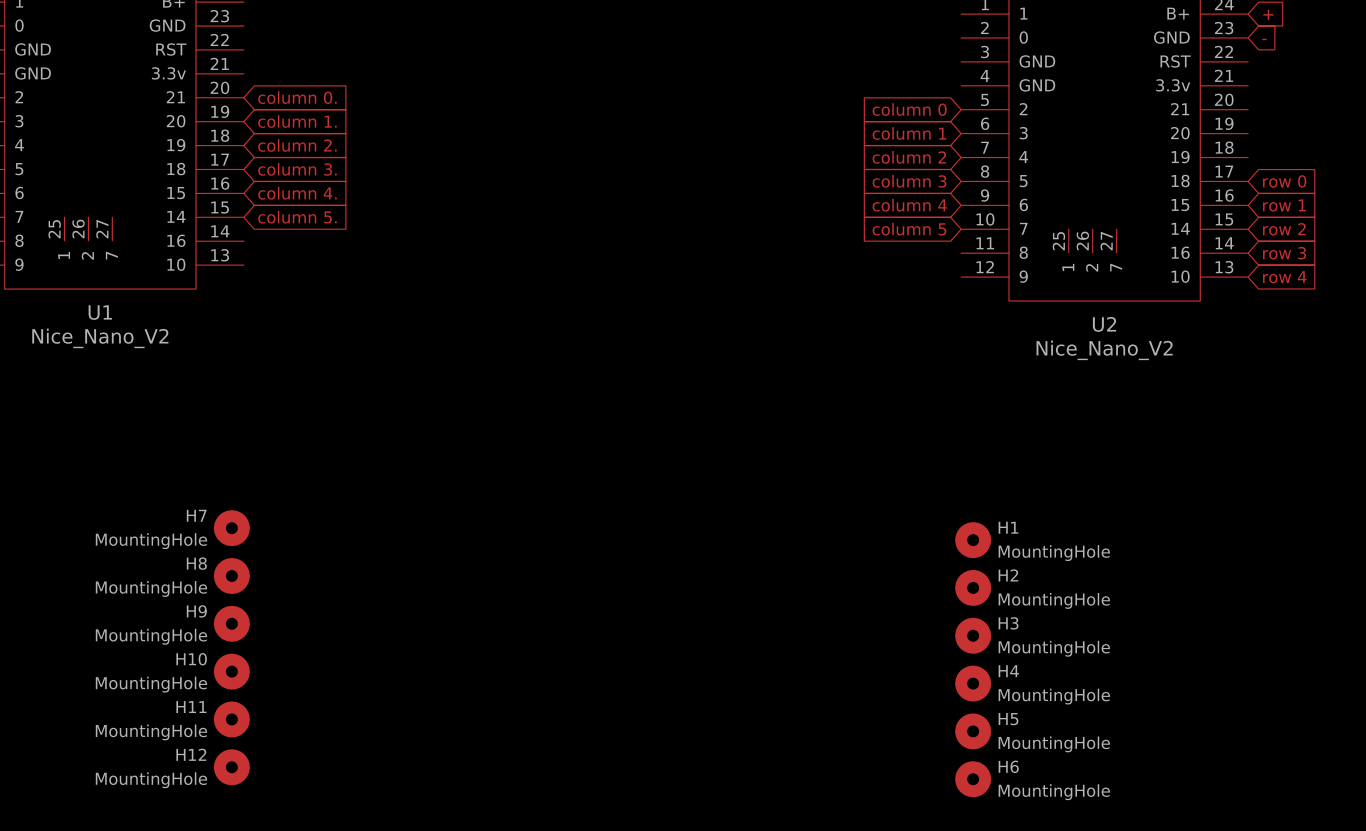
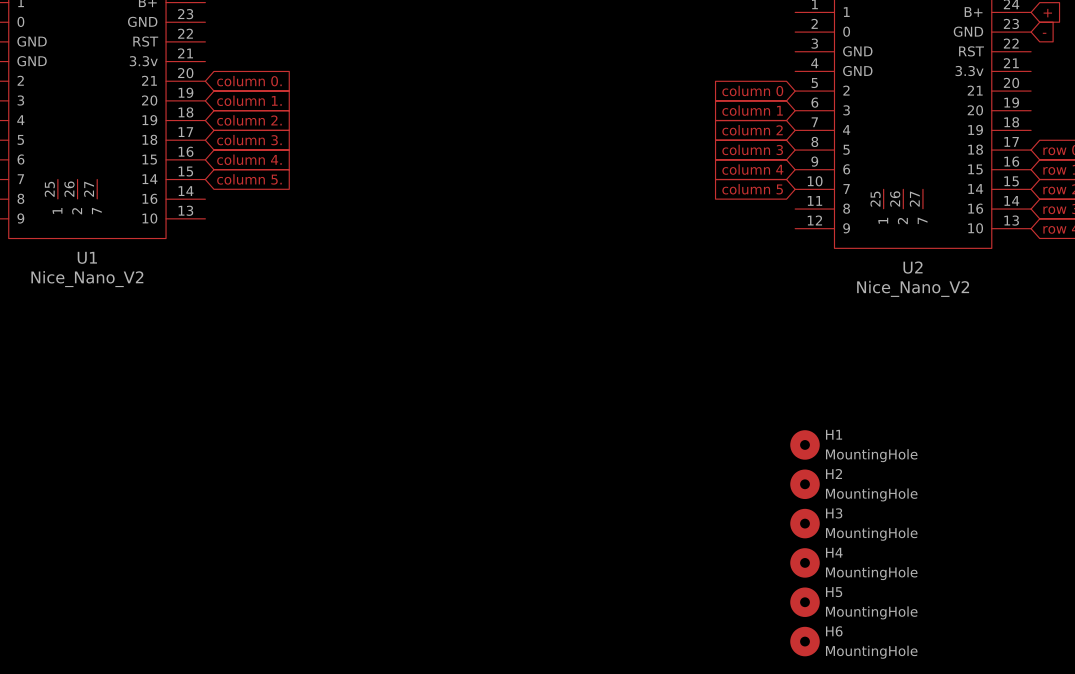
H7: MountingHole (231, 528) -> none
H8: MountingHole (231, 575) -> none
H9: MountingHole (231, 623) -> none
H10: MountingHole (231, 671) -> none
H11: MountingHole (231, 719) -> none
H12: MountingHole (231, 767) -> none

